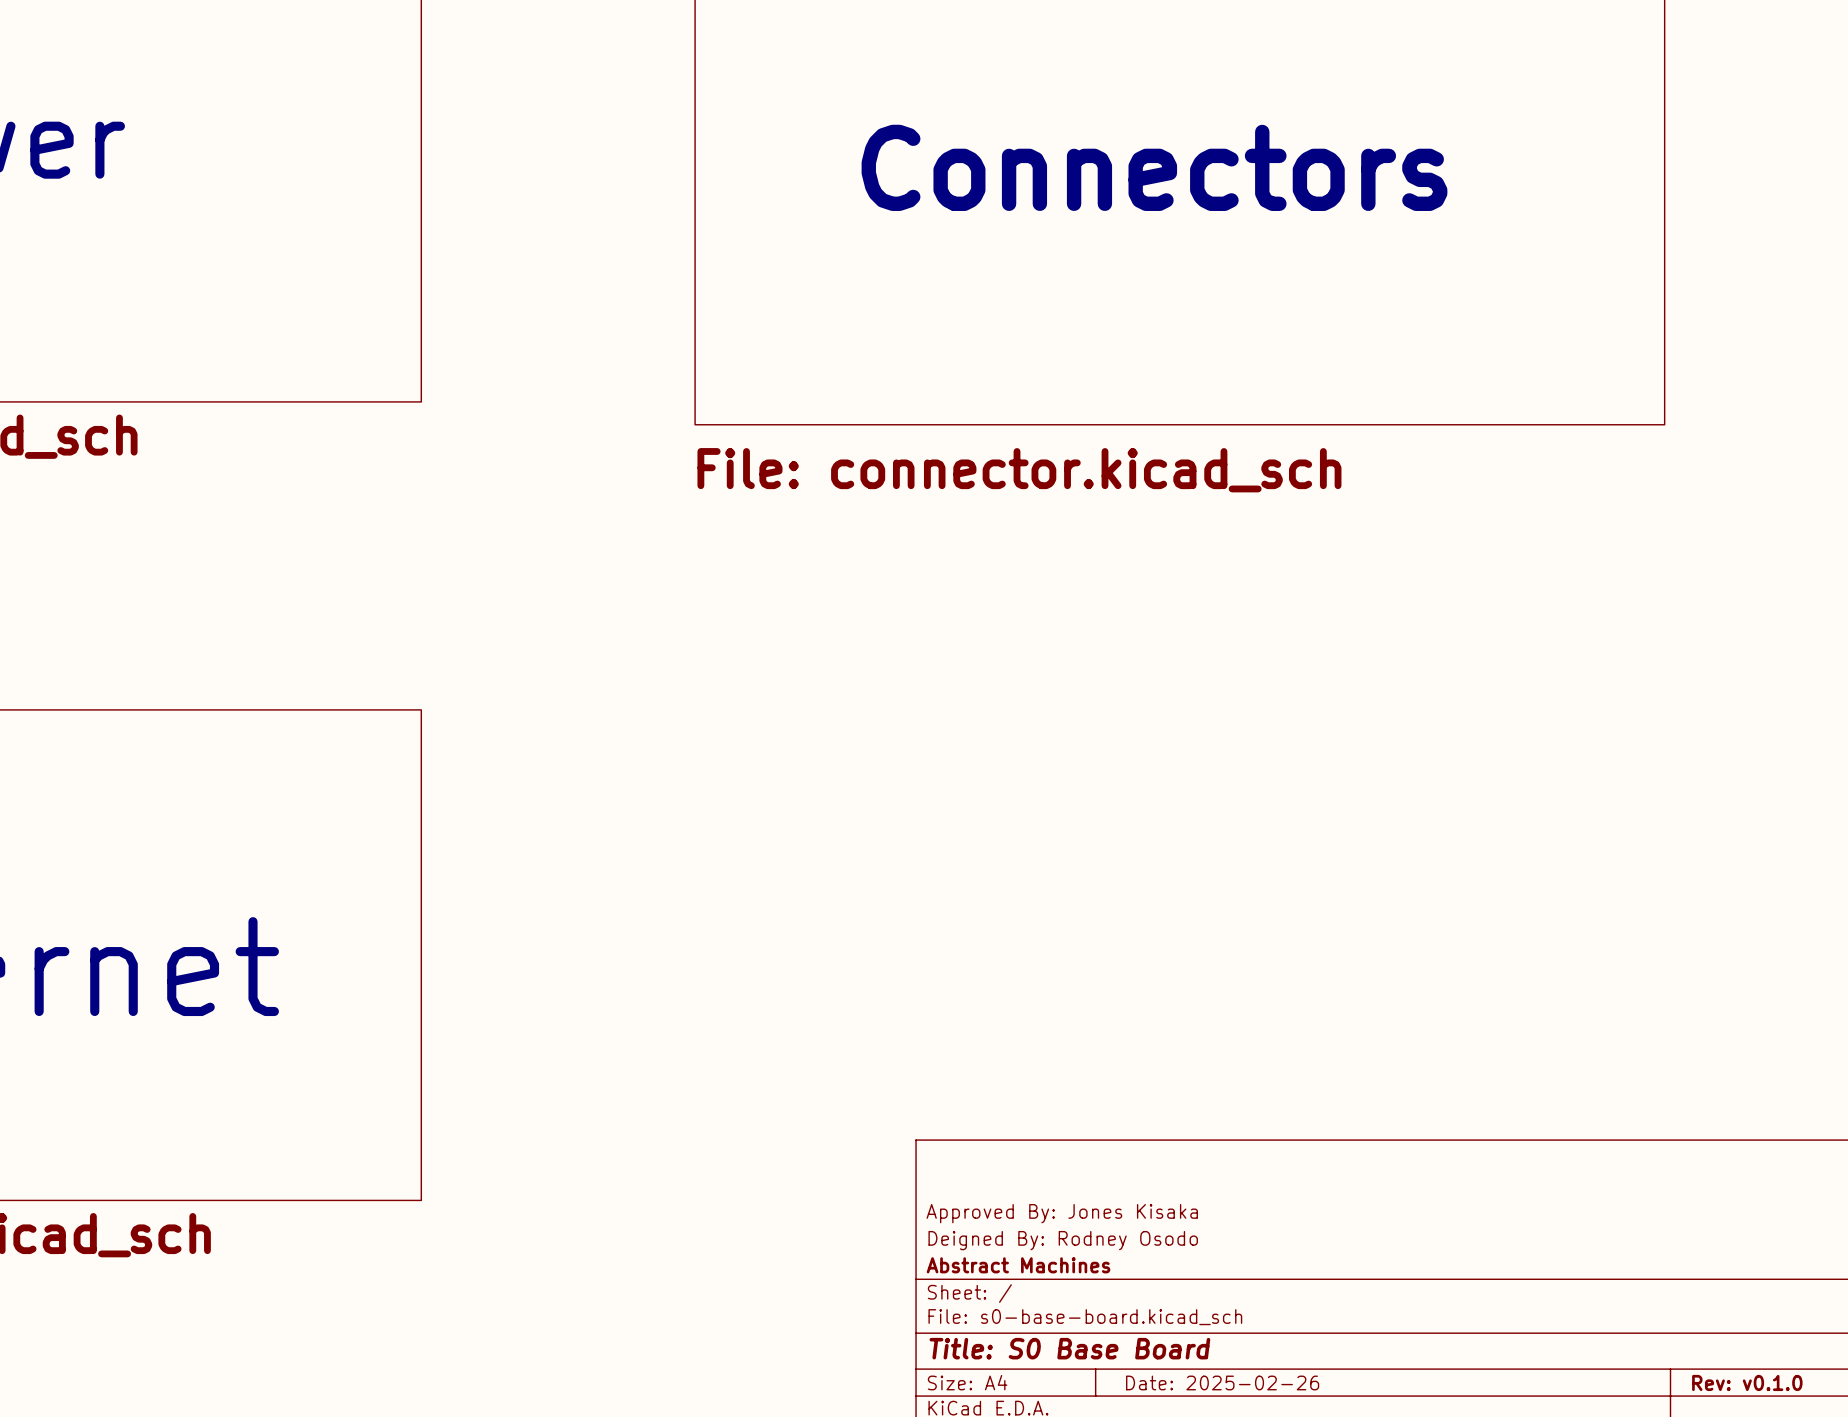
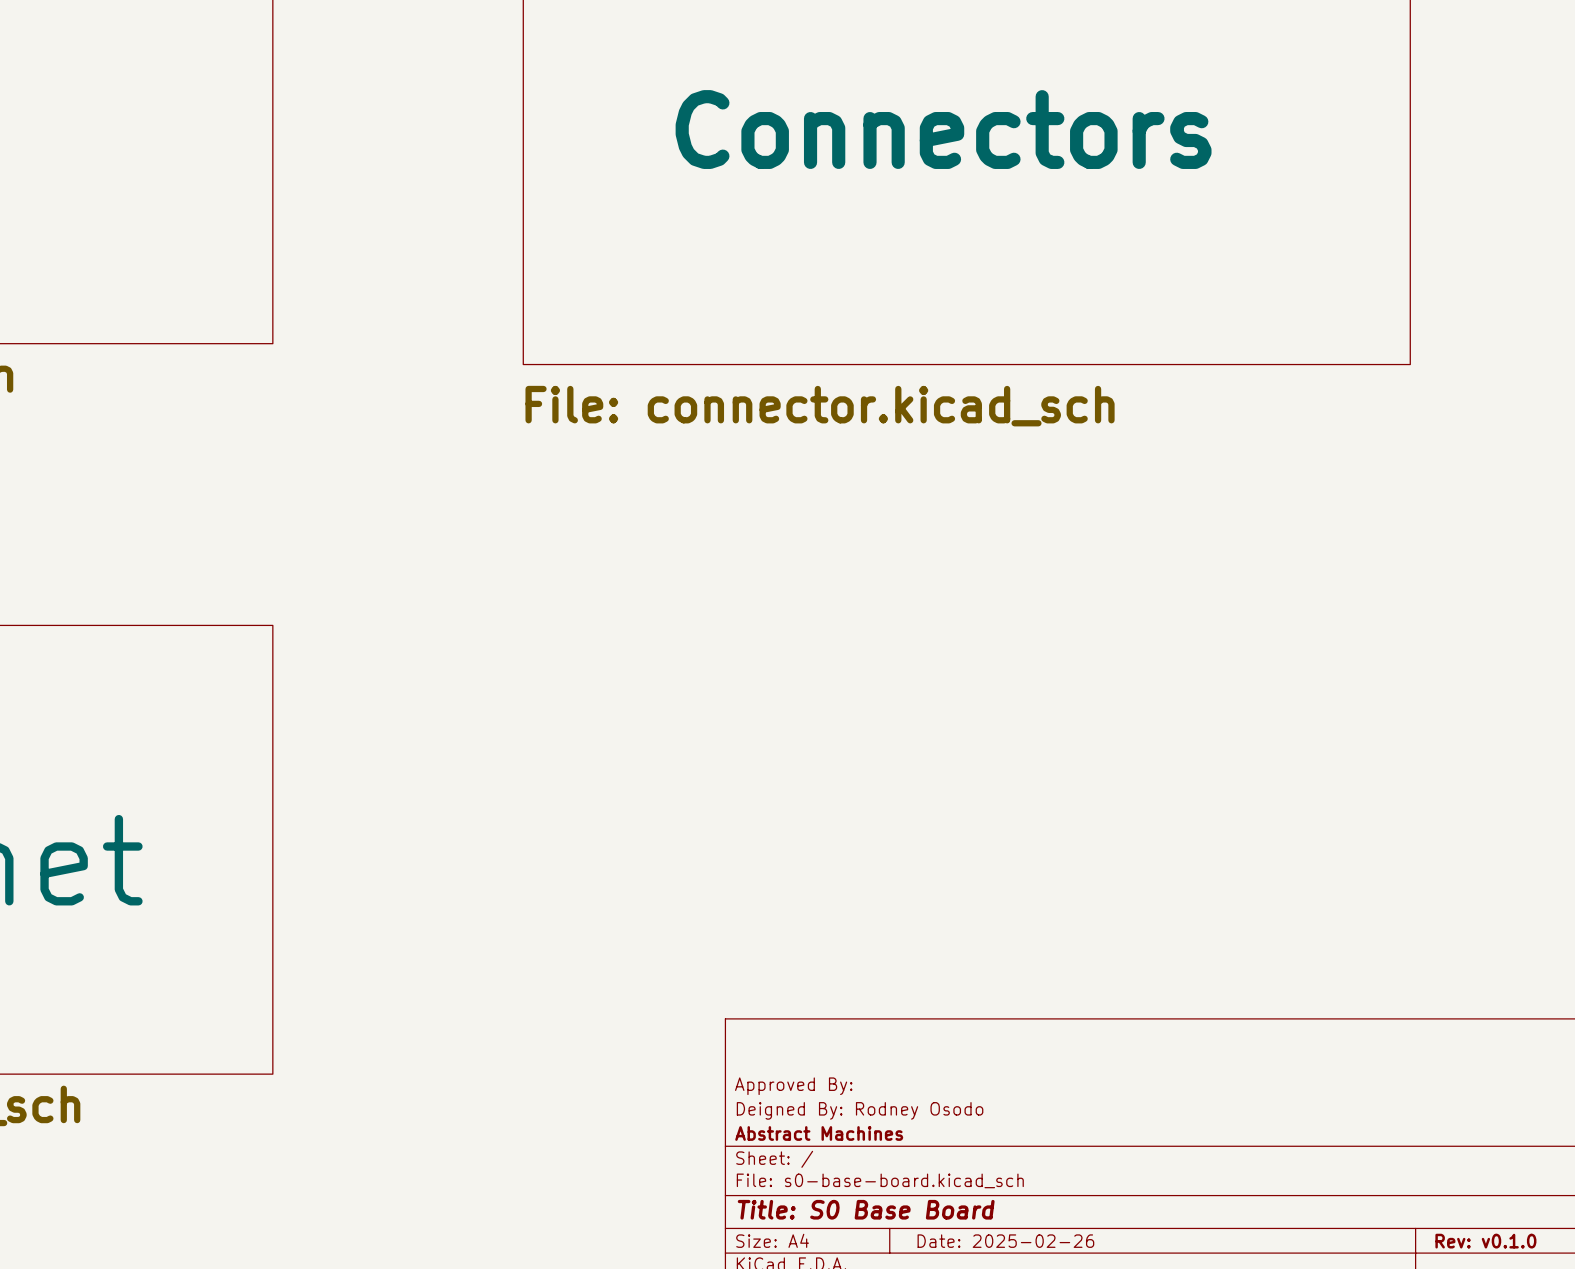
title block: Approved By: Jones Kisaka (1062, 1213) -> Approved By: (793, 1086)

